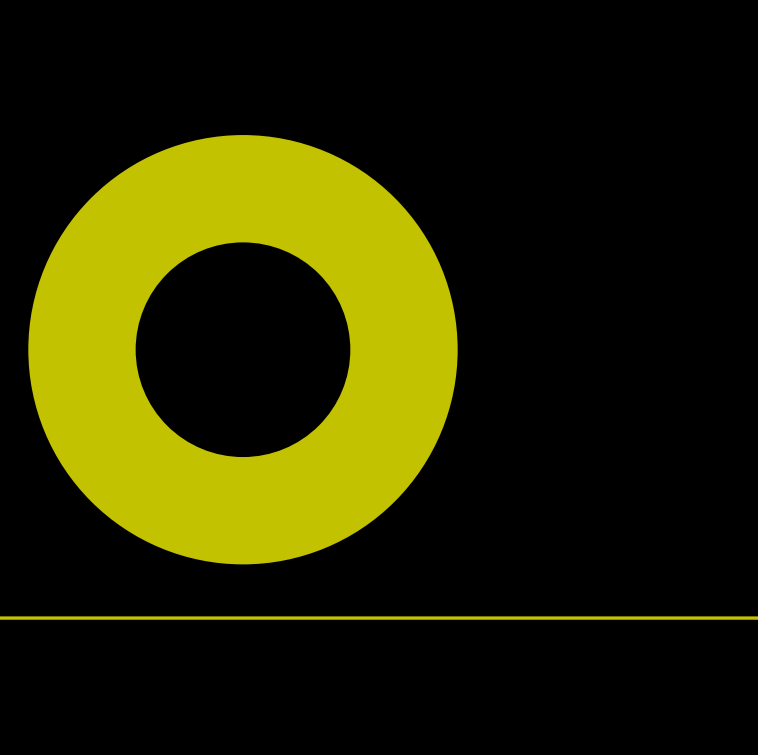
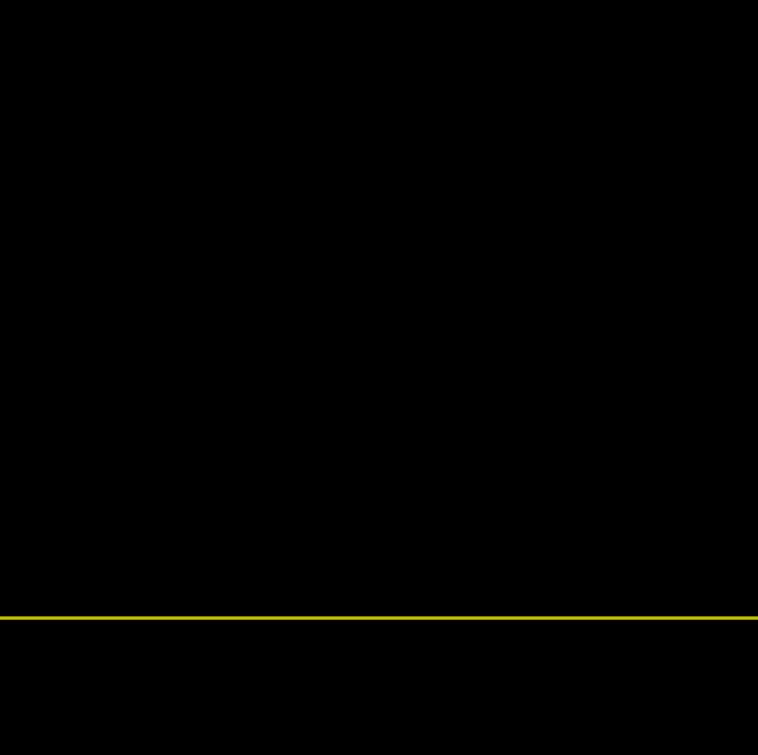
part: (242, 349) -> none

